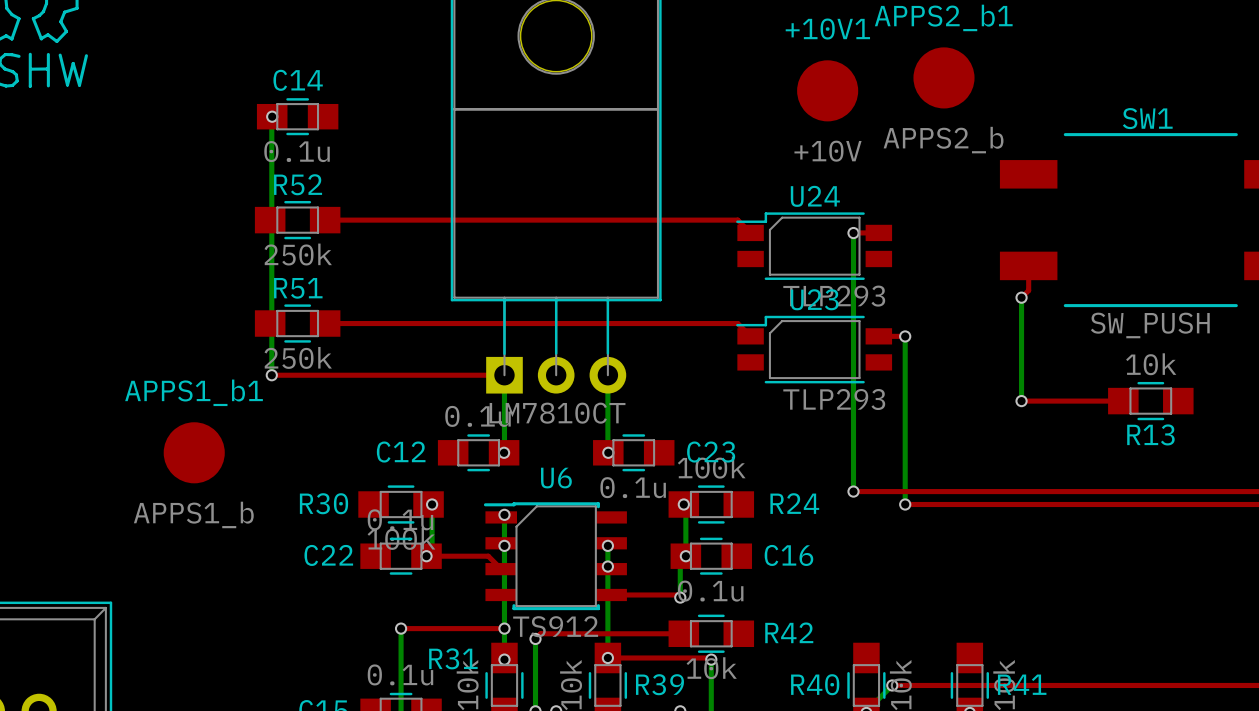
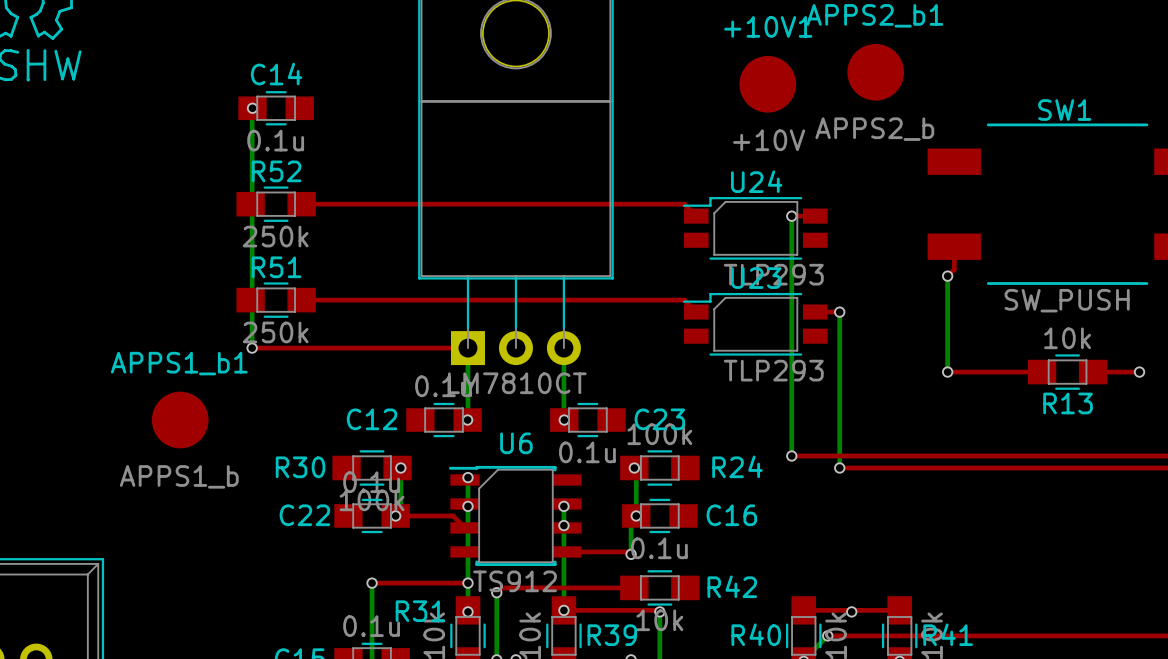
top track: none -> (1093, 372) (1139, 372)
via: none -> (1139, 372)
top track: none -> (803, 610) (851, 611) (899, 610)
via: none -> (851, 611)

